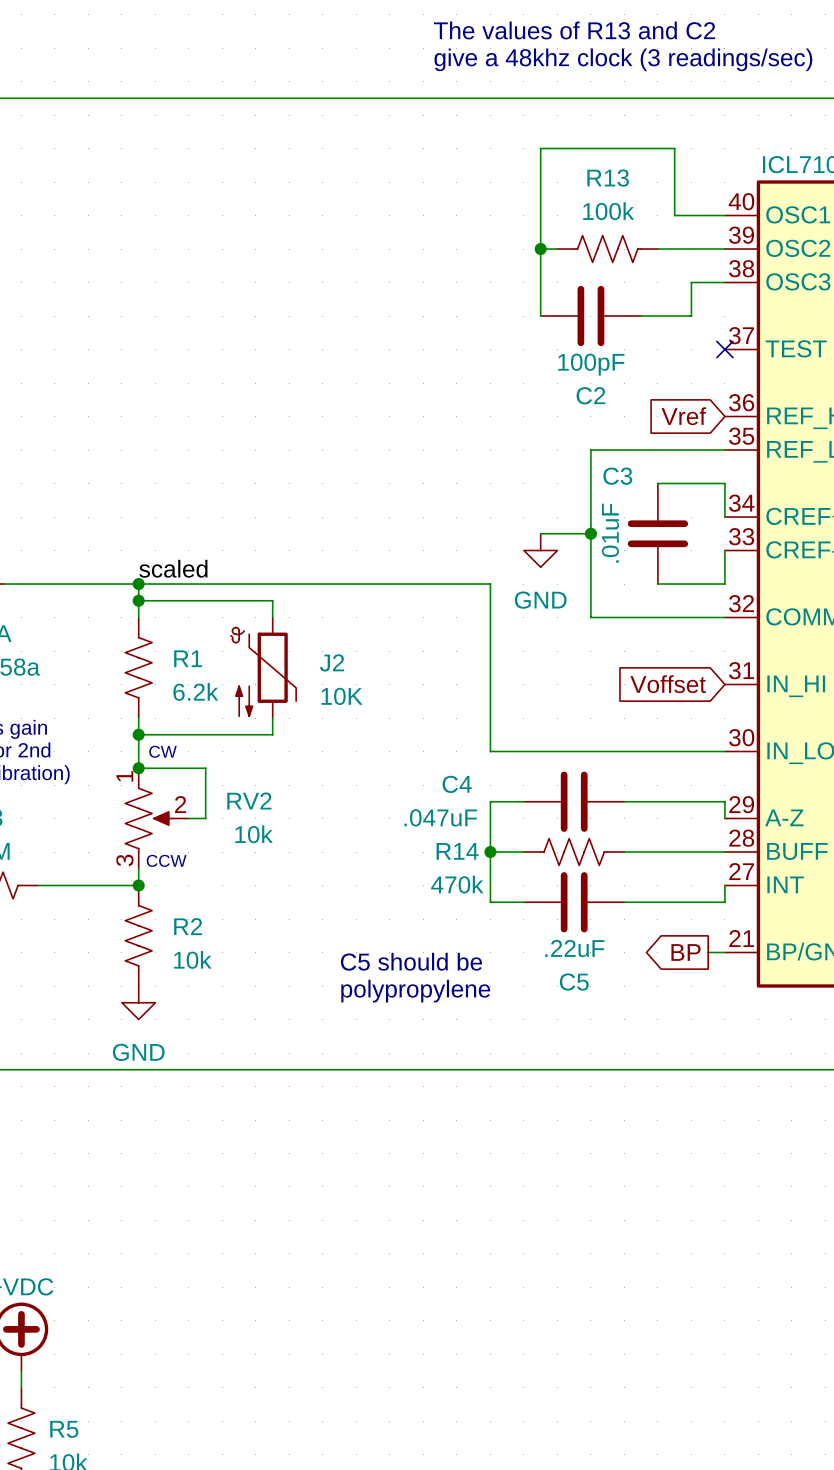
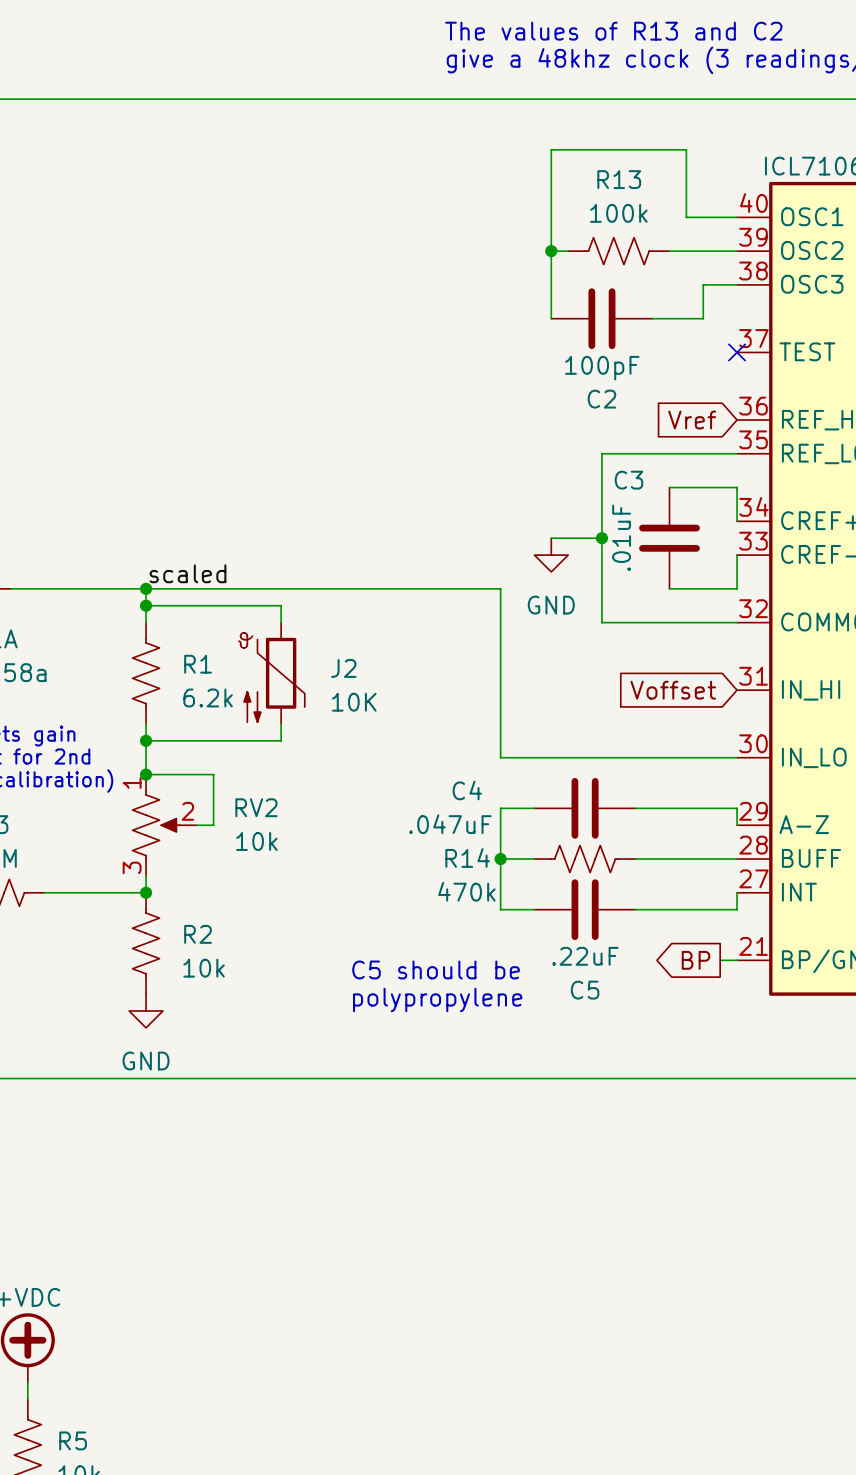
text: CW (163, 751) -> none
text: CCW (166, 860) -> none

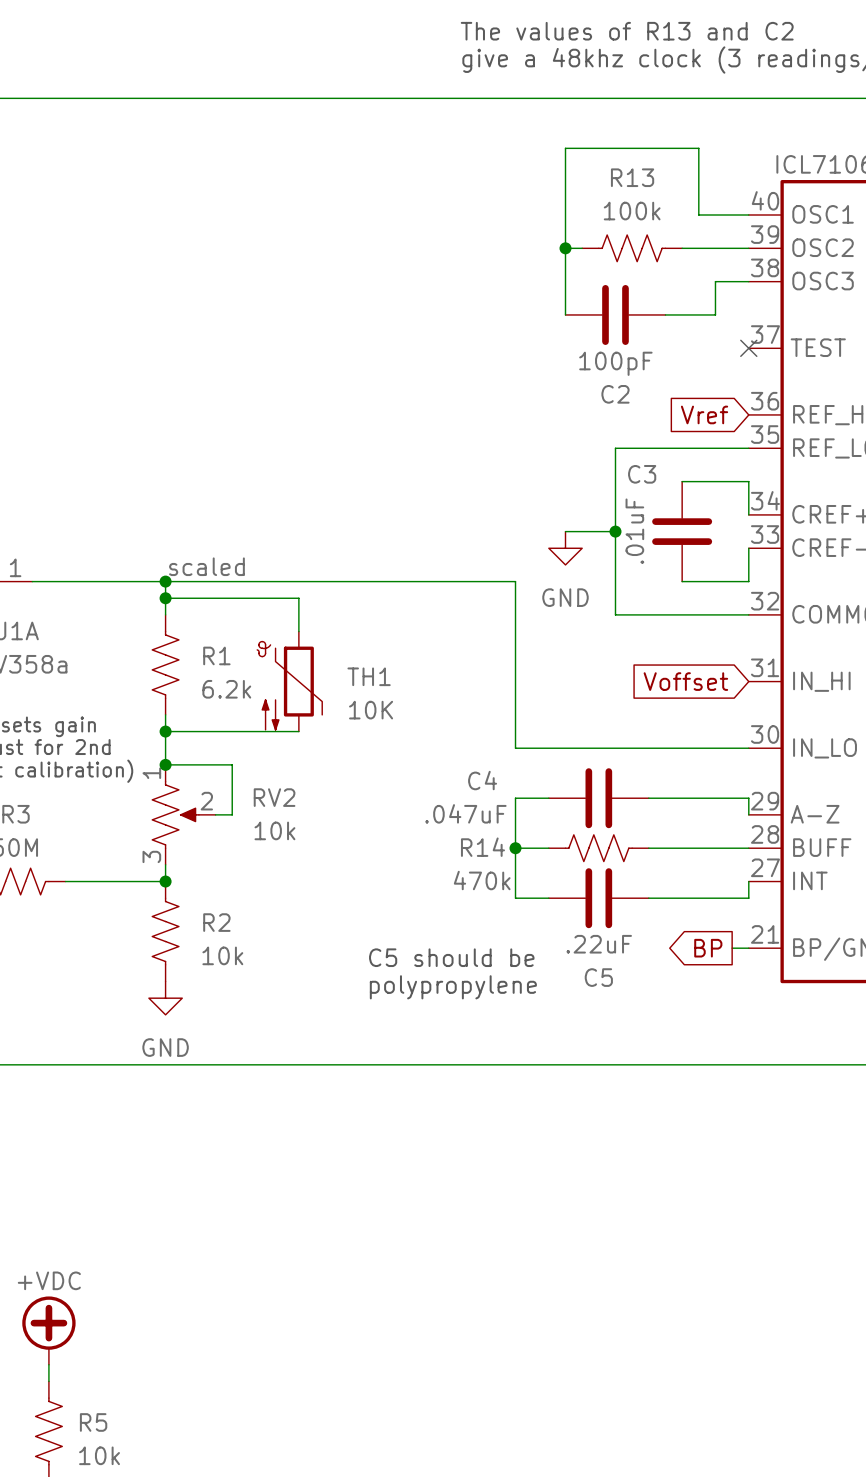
J2: 10K (271, 673) -> none
TH1: none -> 10K (289, 681)

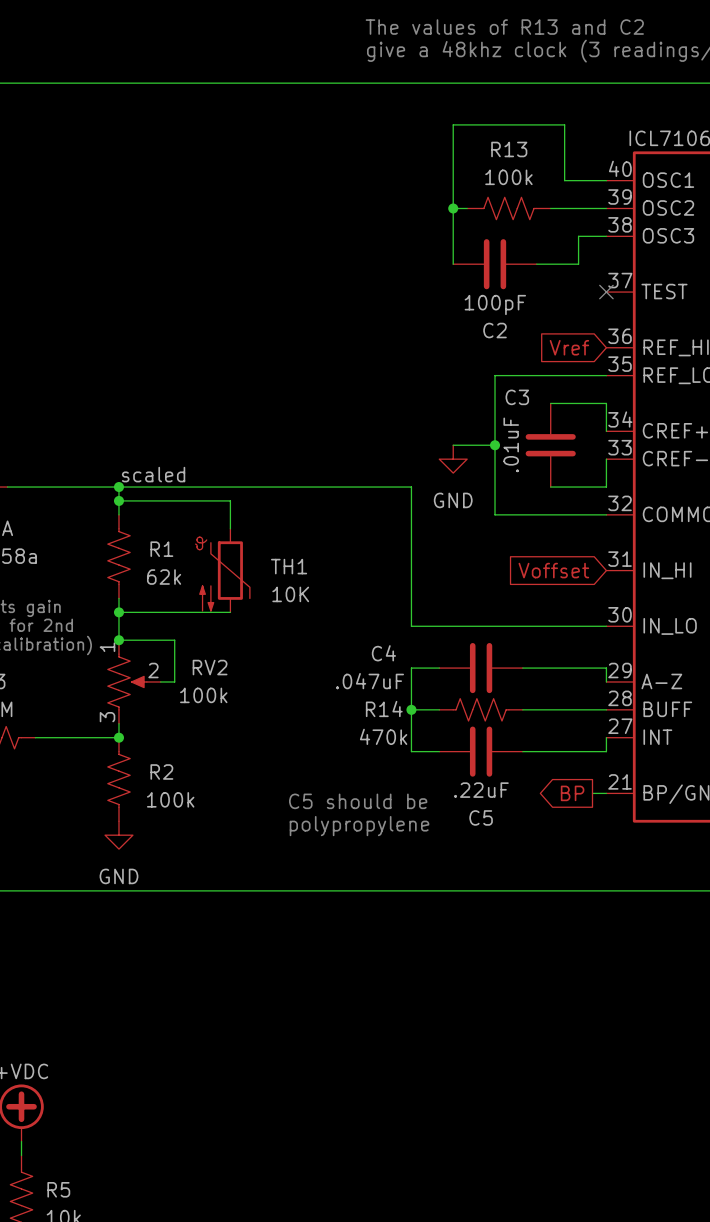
R1 value: 6.2k (226, 689) -> 62k (164, 577)
RV2 value: 10k (274, 830) -> 100k (203, 695)
R2 value: 10k (222, 955) -> 100k (170, 799)

